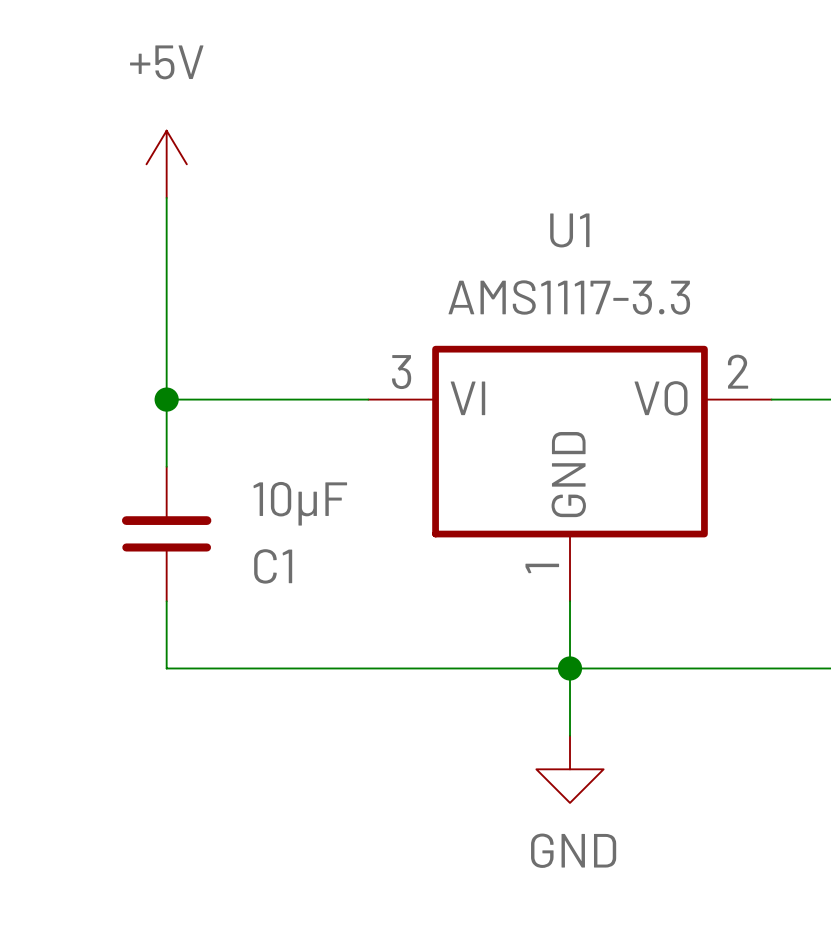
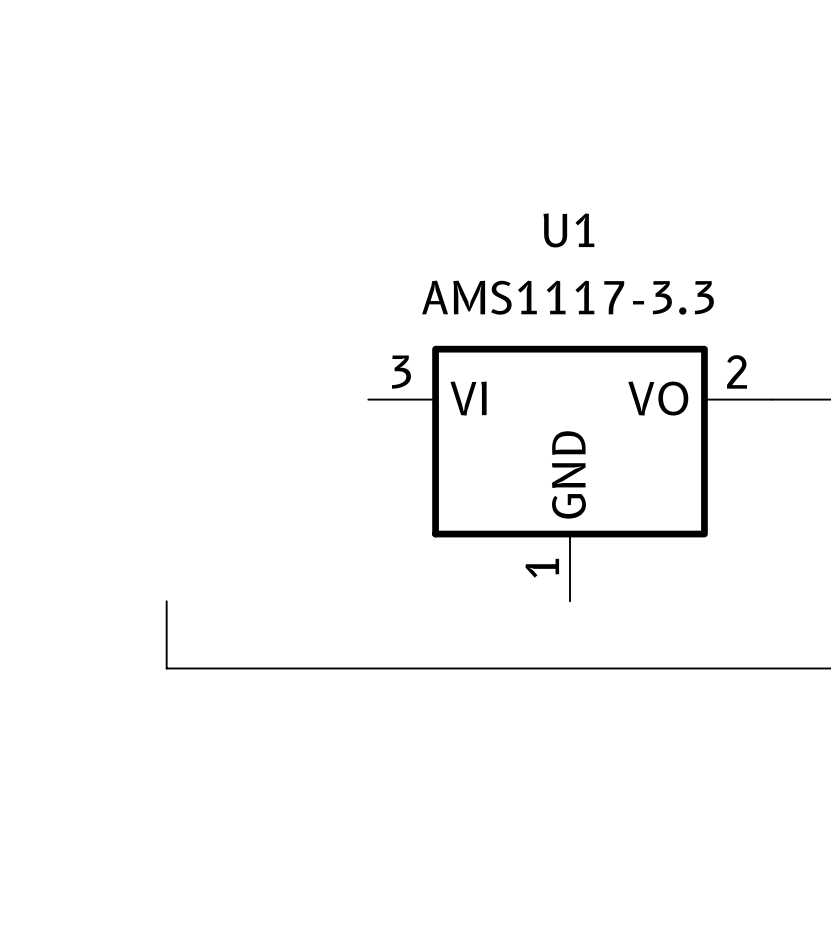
power symbol: +5V (166, 164) -> none
wire: (166, 197) (166, 466) -> none
wire: (166, 399) (368, 399) -> none
junction: (166, 399) -> none
C1: 10µF (166, 534) -> none
wire: (570, 601) (570, 735) -> none
junction: (570, 668) -> none
power symbol: GND (570, 769) -> none

